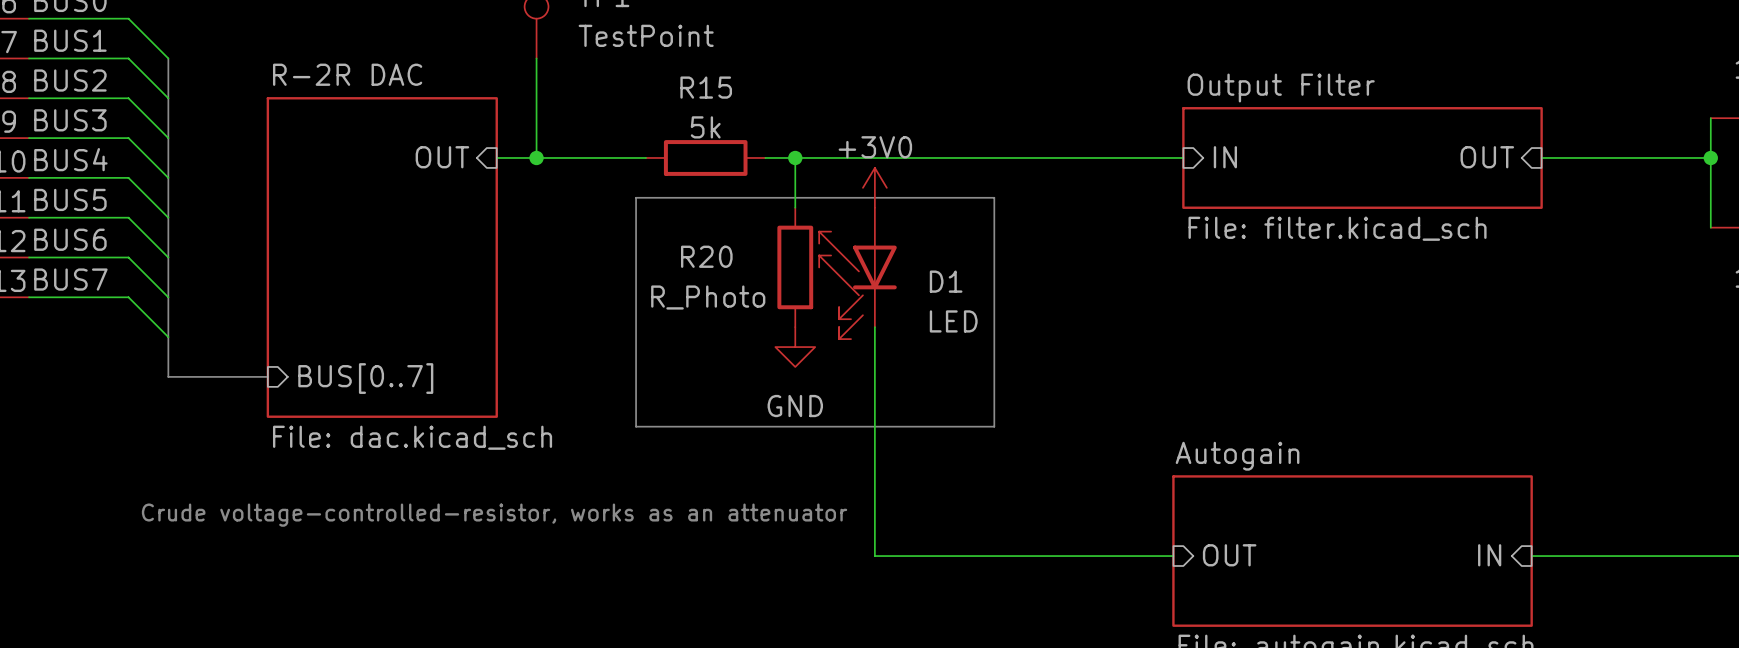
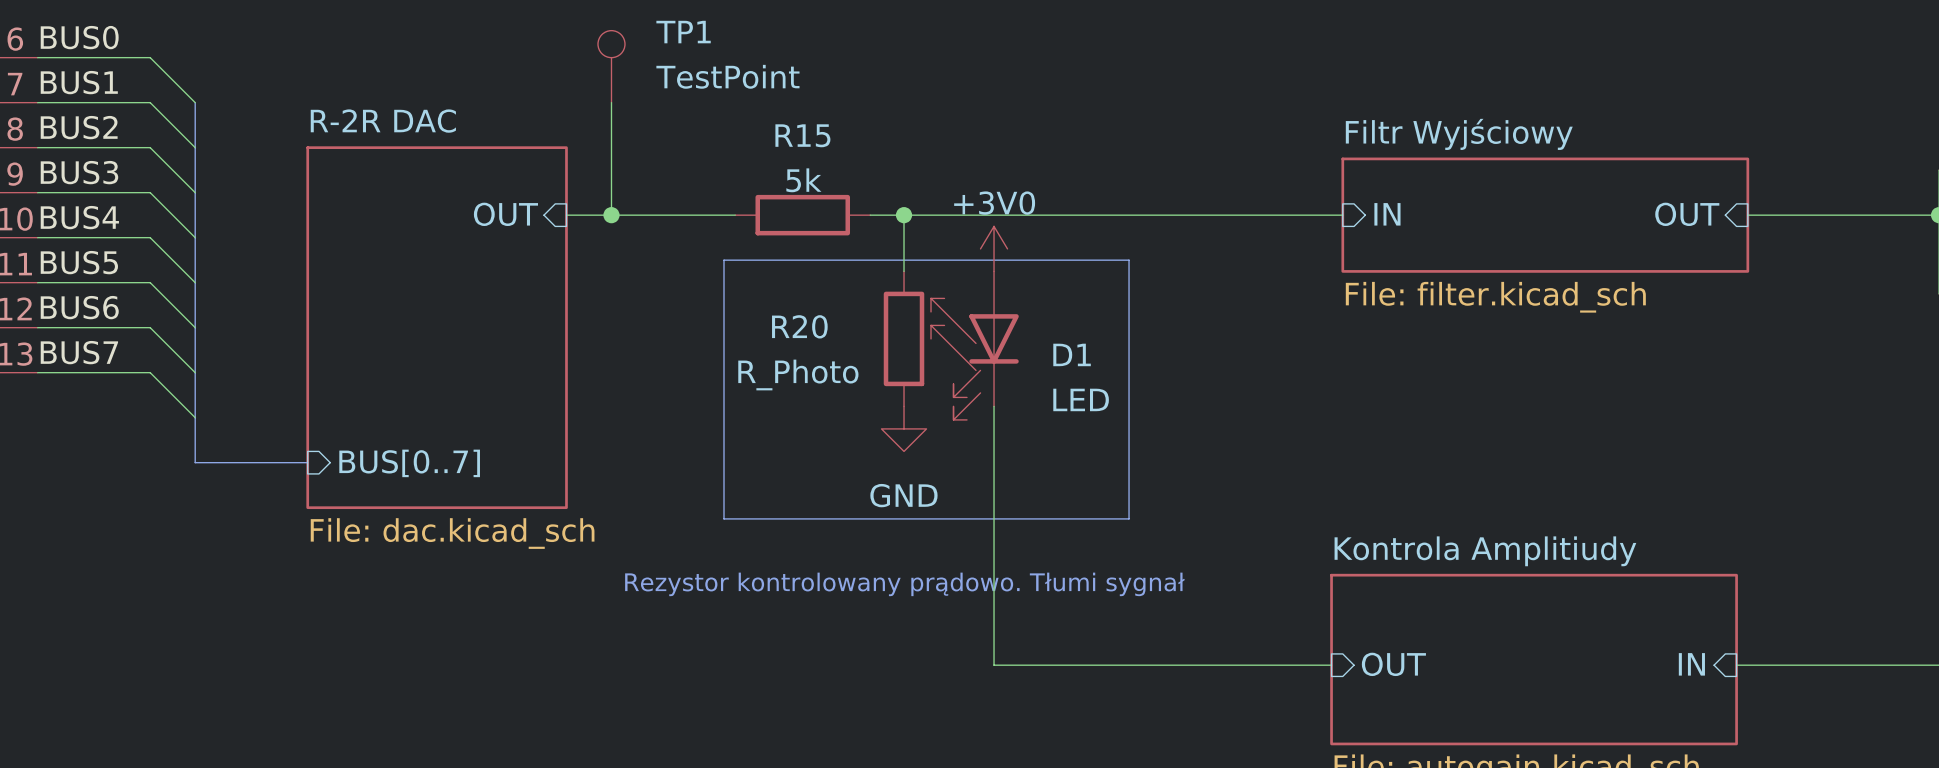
sheet Output Filter name: Output Filter (1281, 88) -> Filtr Wyjściowy (1459, 134)
sheet Autogain name: Autogain (1237, 456) -> Kontrola Amplitiudy (1485, 551)
text: none -> Rezystor kontrolowany prądowo. Tłumi sygnał (905, 584)
text: Crude voltage-controlled-resistor, works as an attenuator (494, 515) -> none

